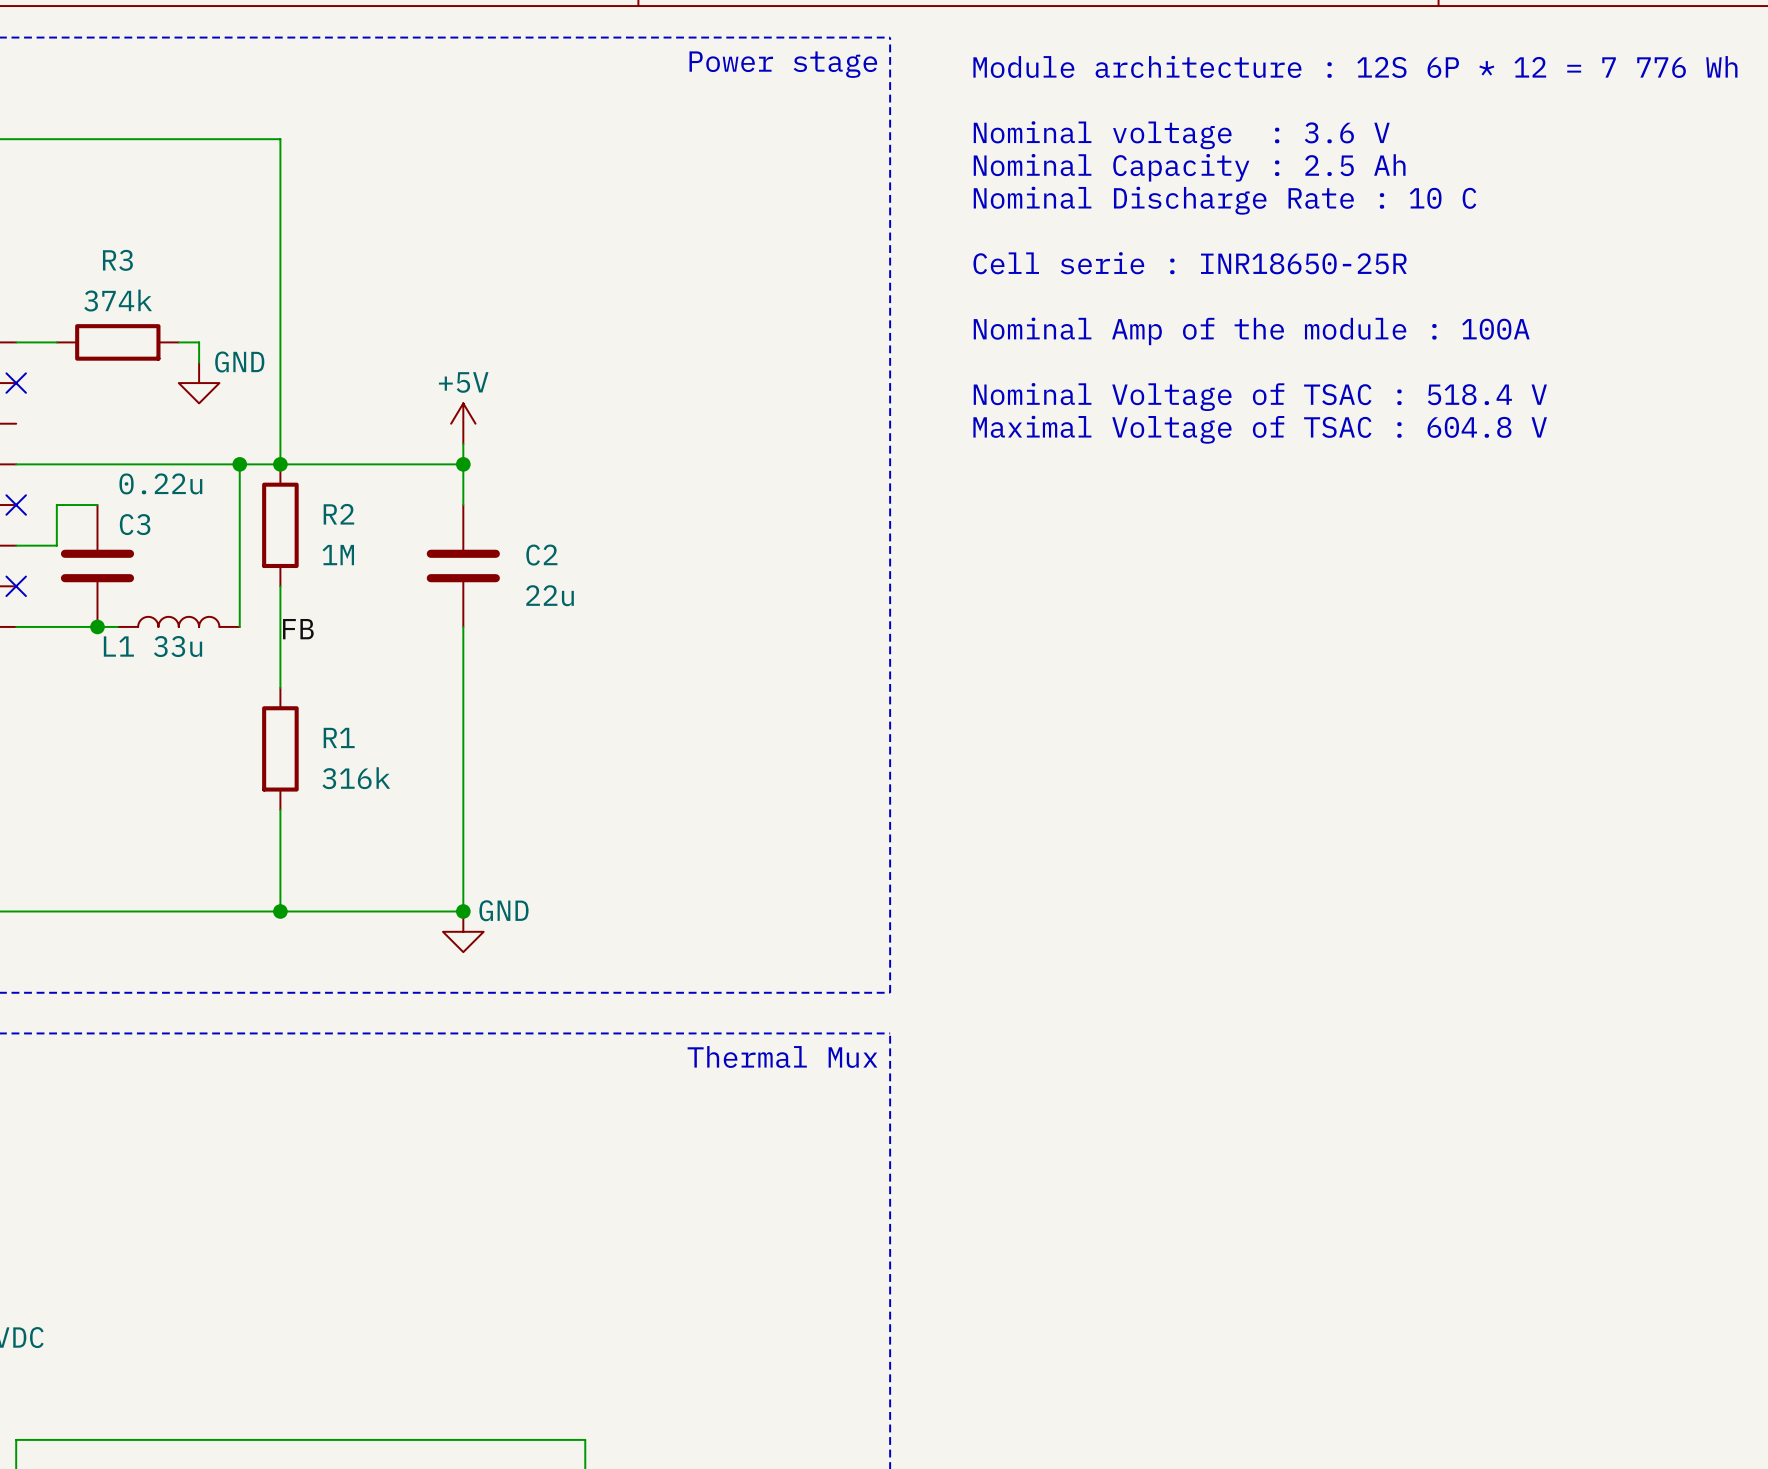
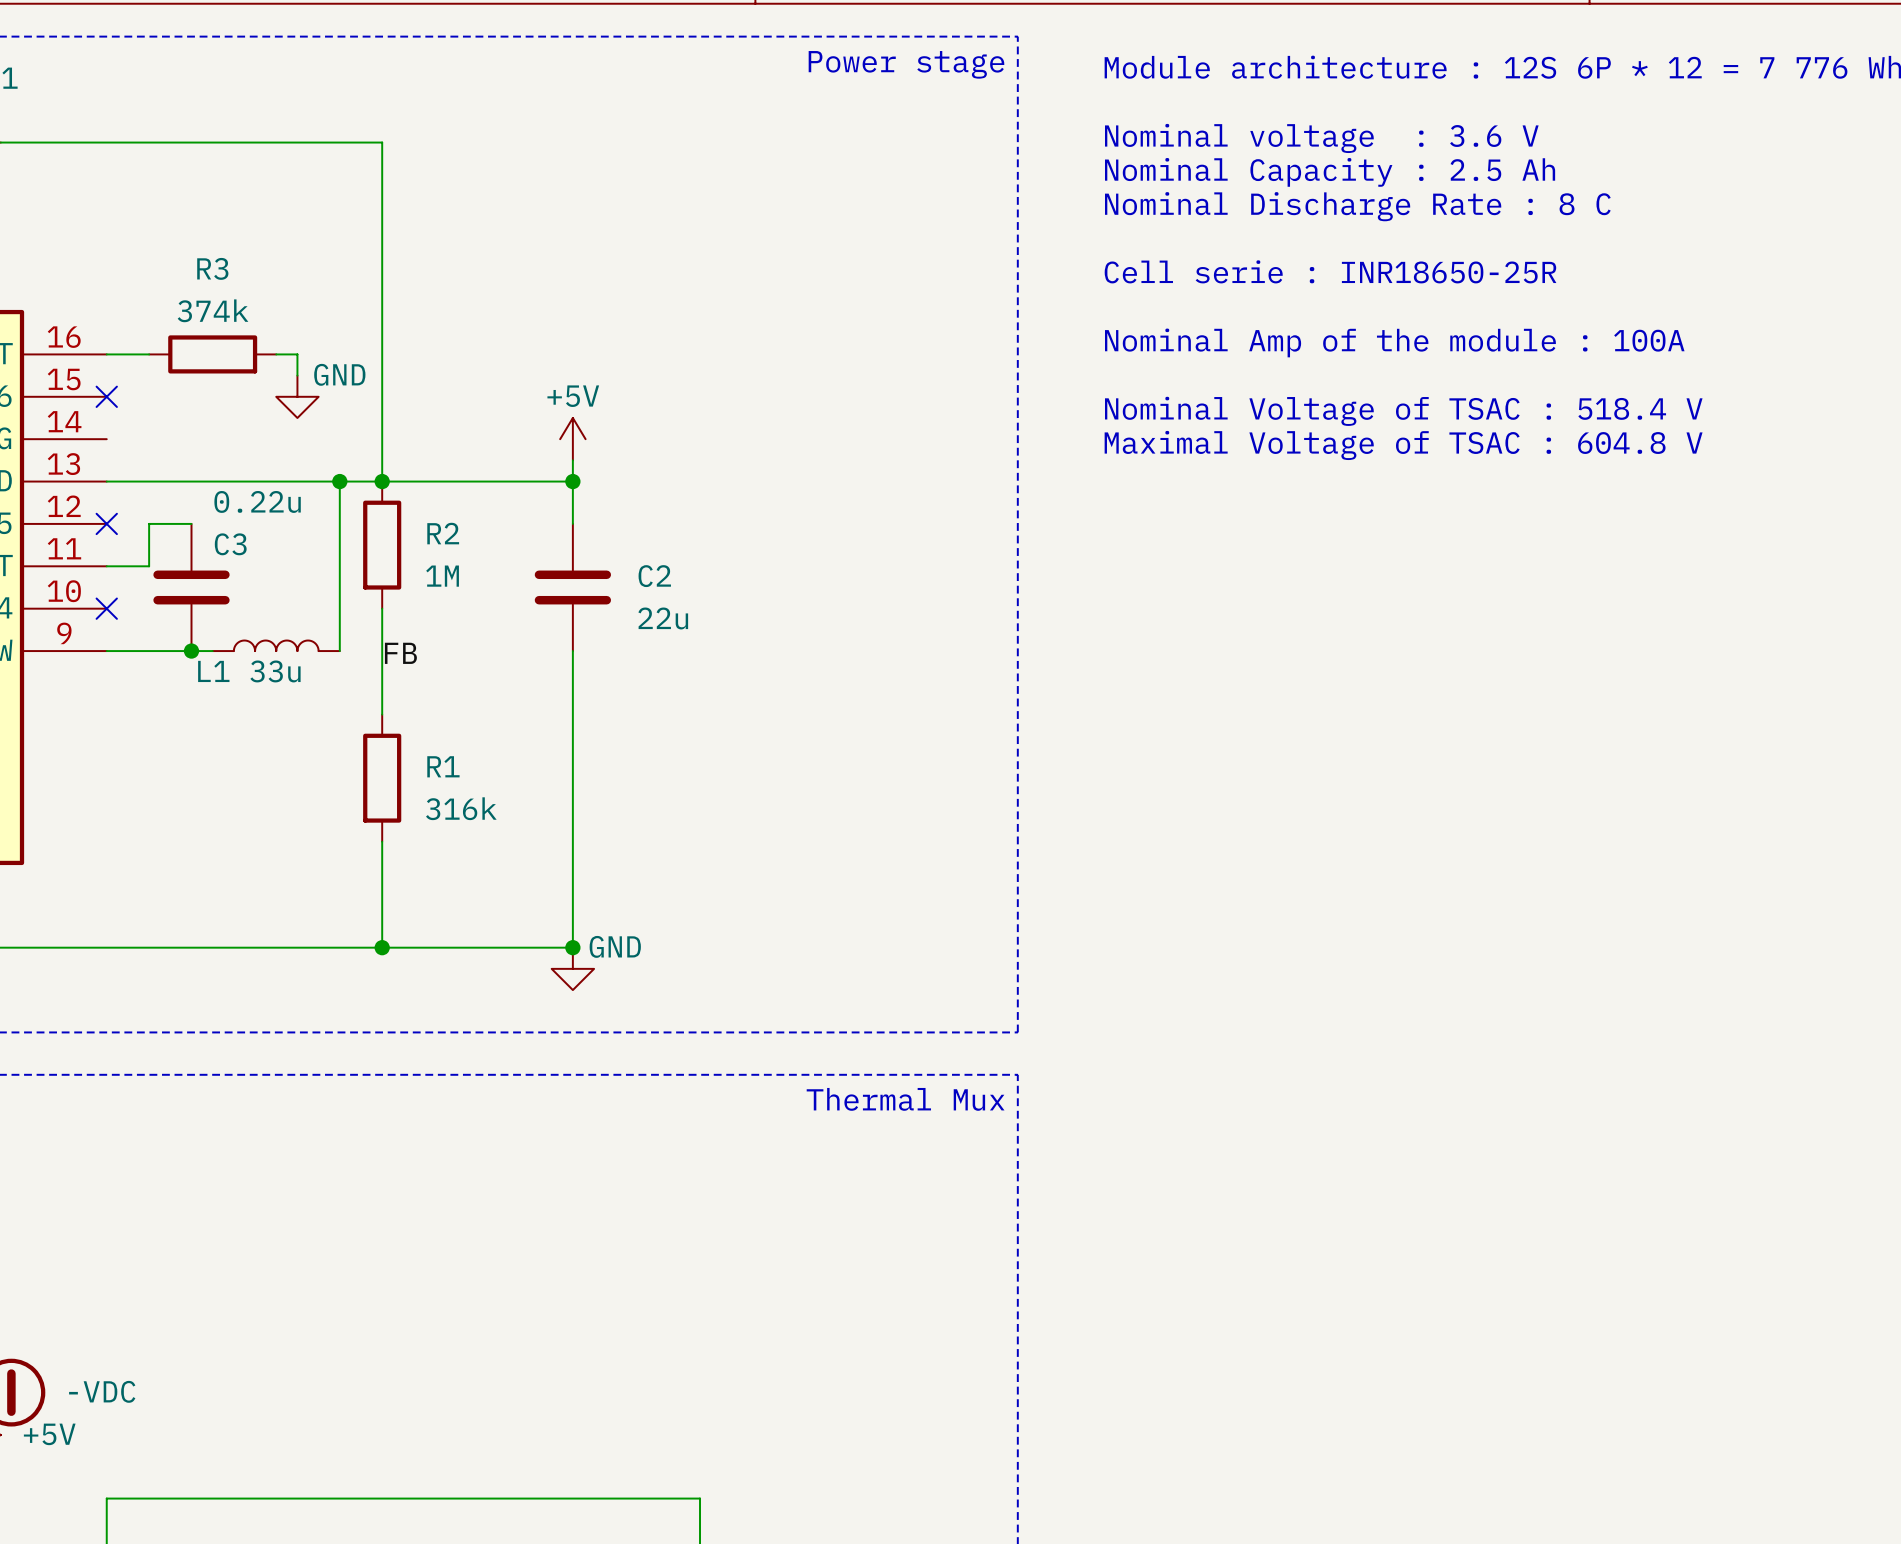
text: Nominal Discharge Rate : 10 C (1225, 200) -> Nominal Discharge Rate : 8 C (1357, 206)

